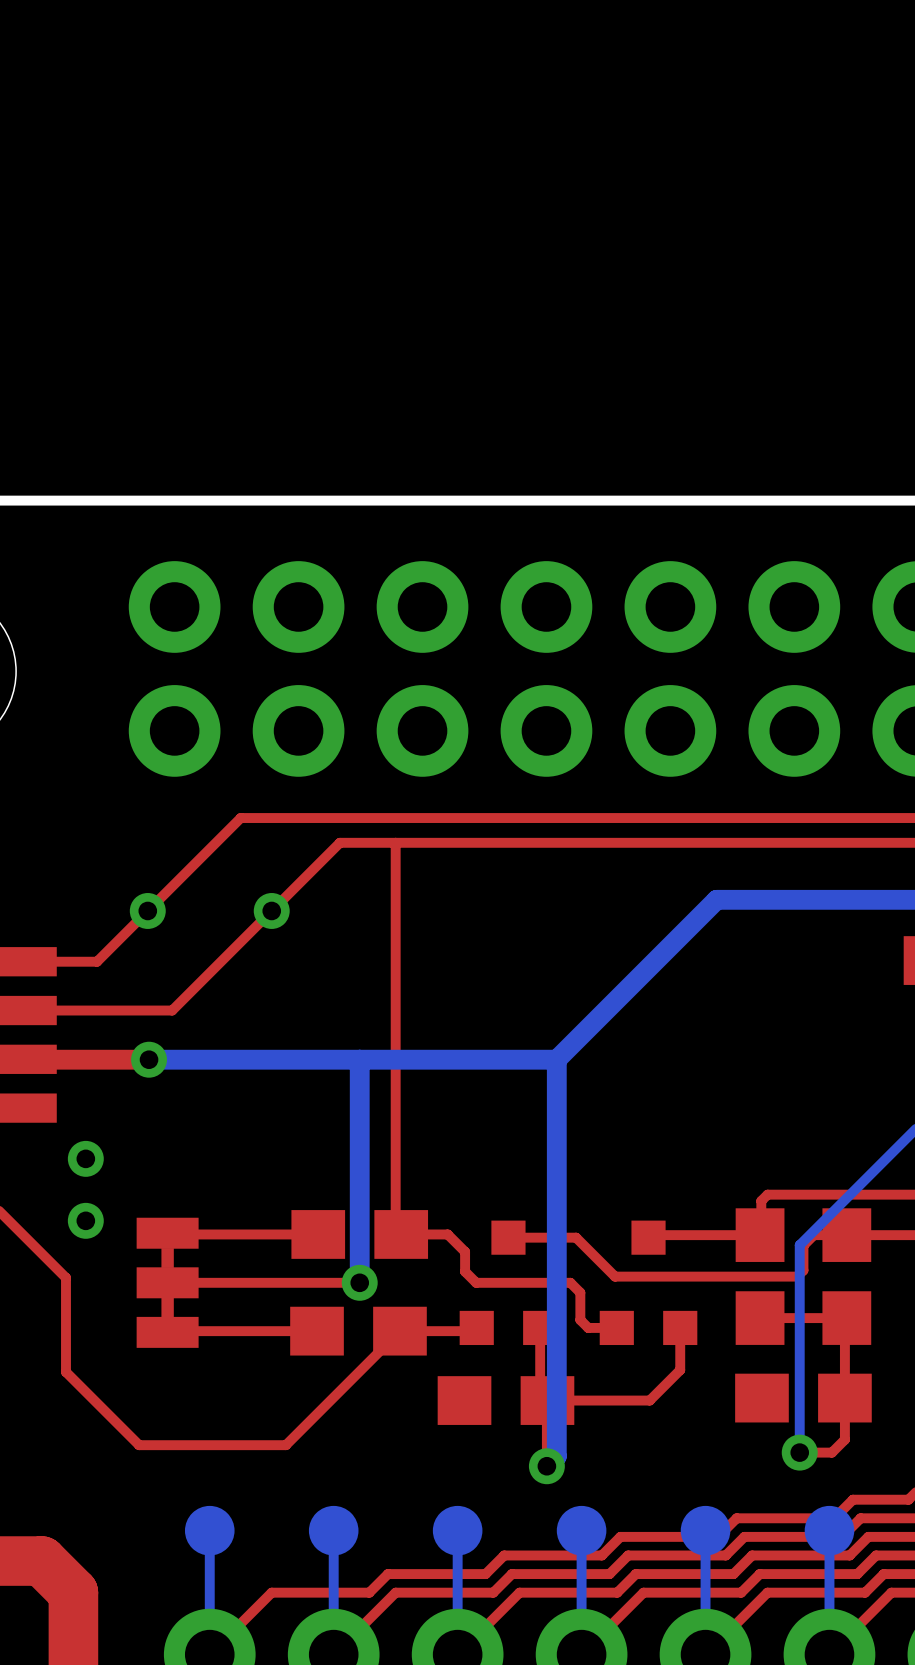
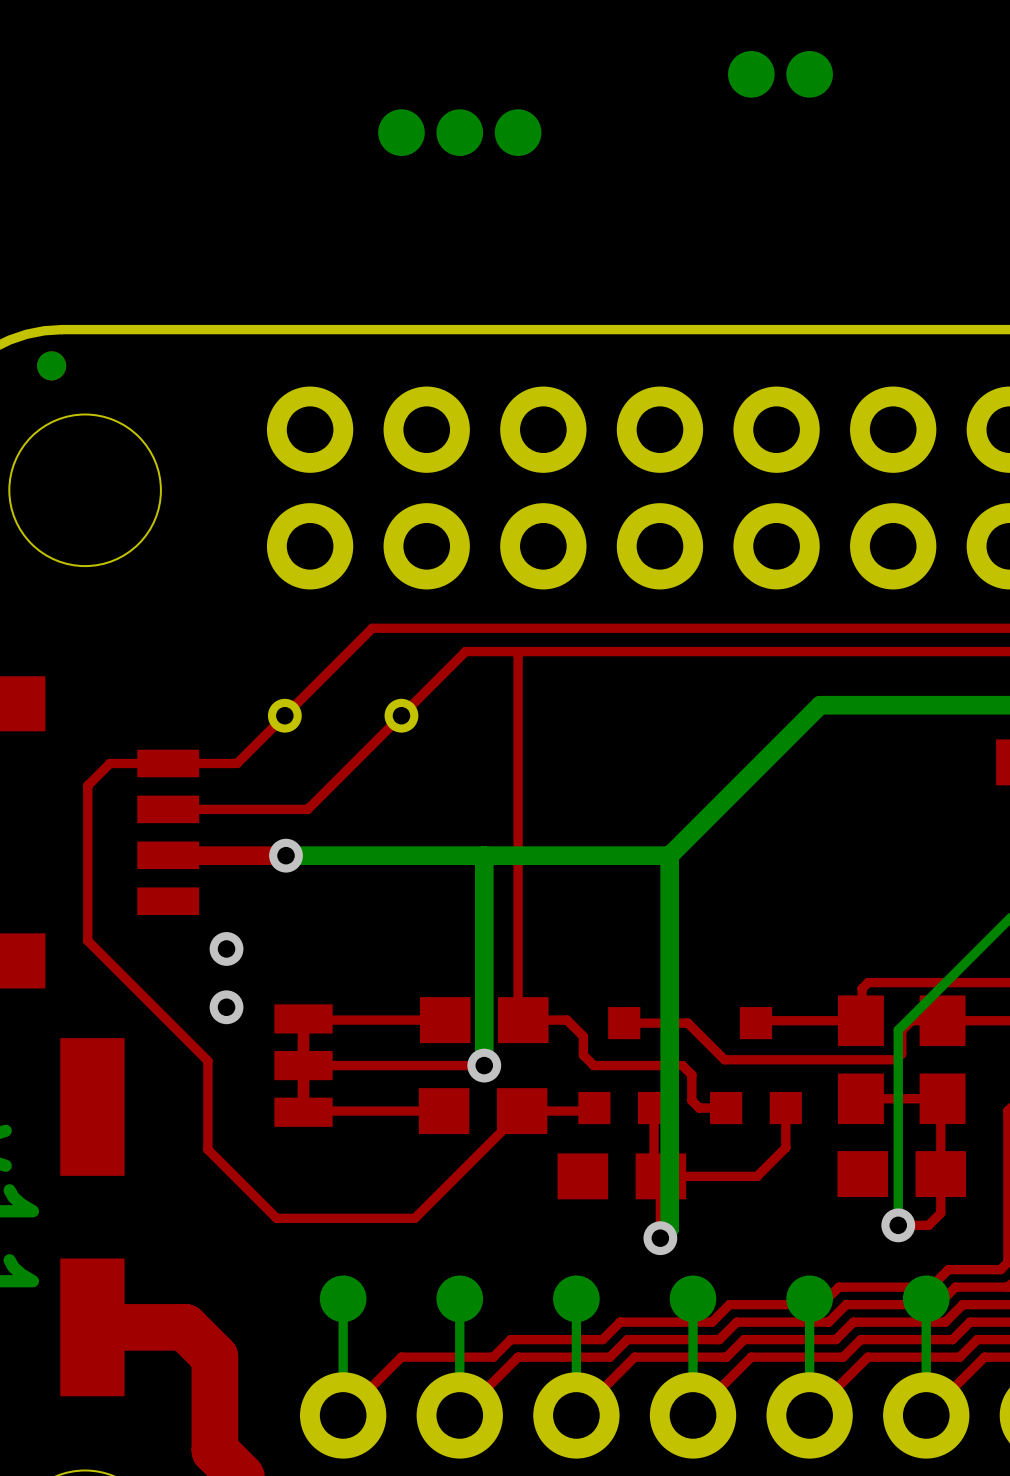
part: none -> (751, 74)
part: none -> (809, 74)
part: none -> (401, 132)
part: none -> (459, 132)
part: none -> (518, 132)

